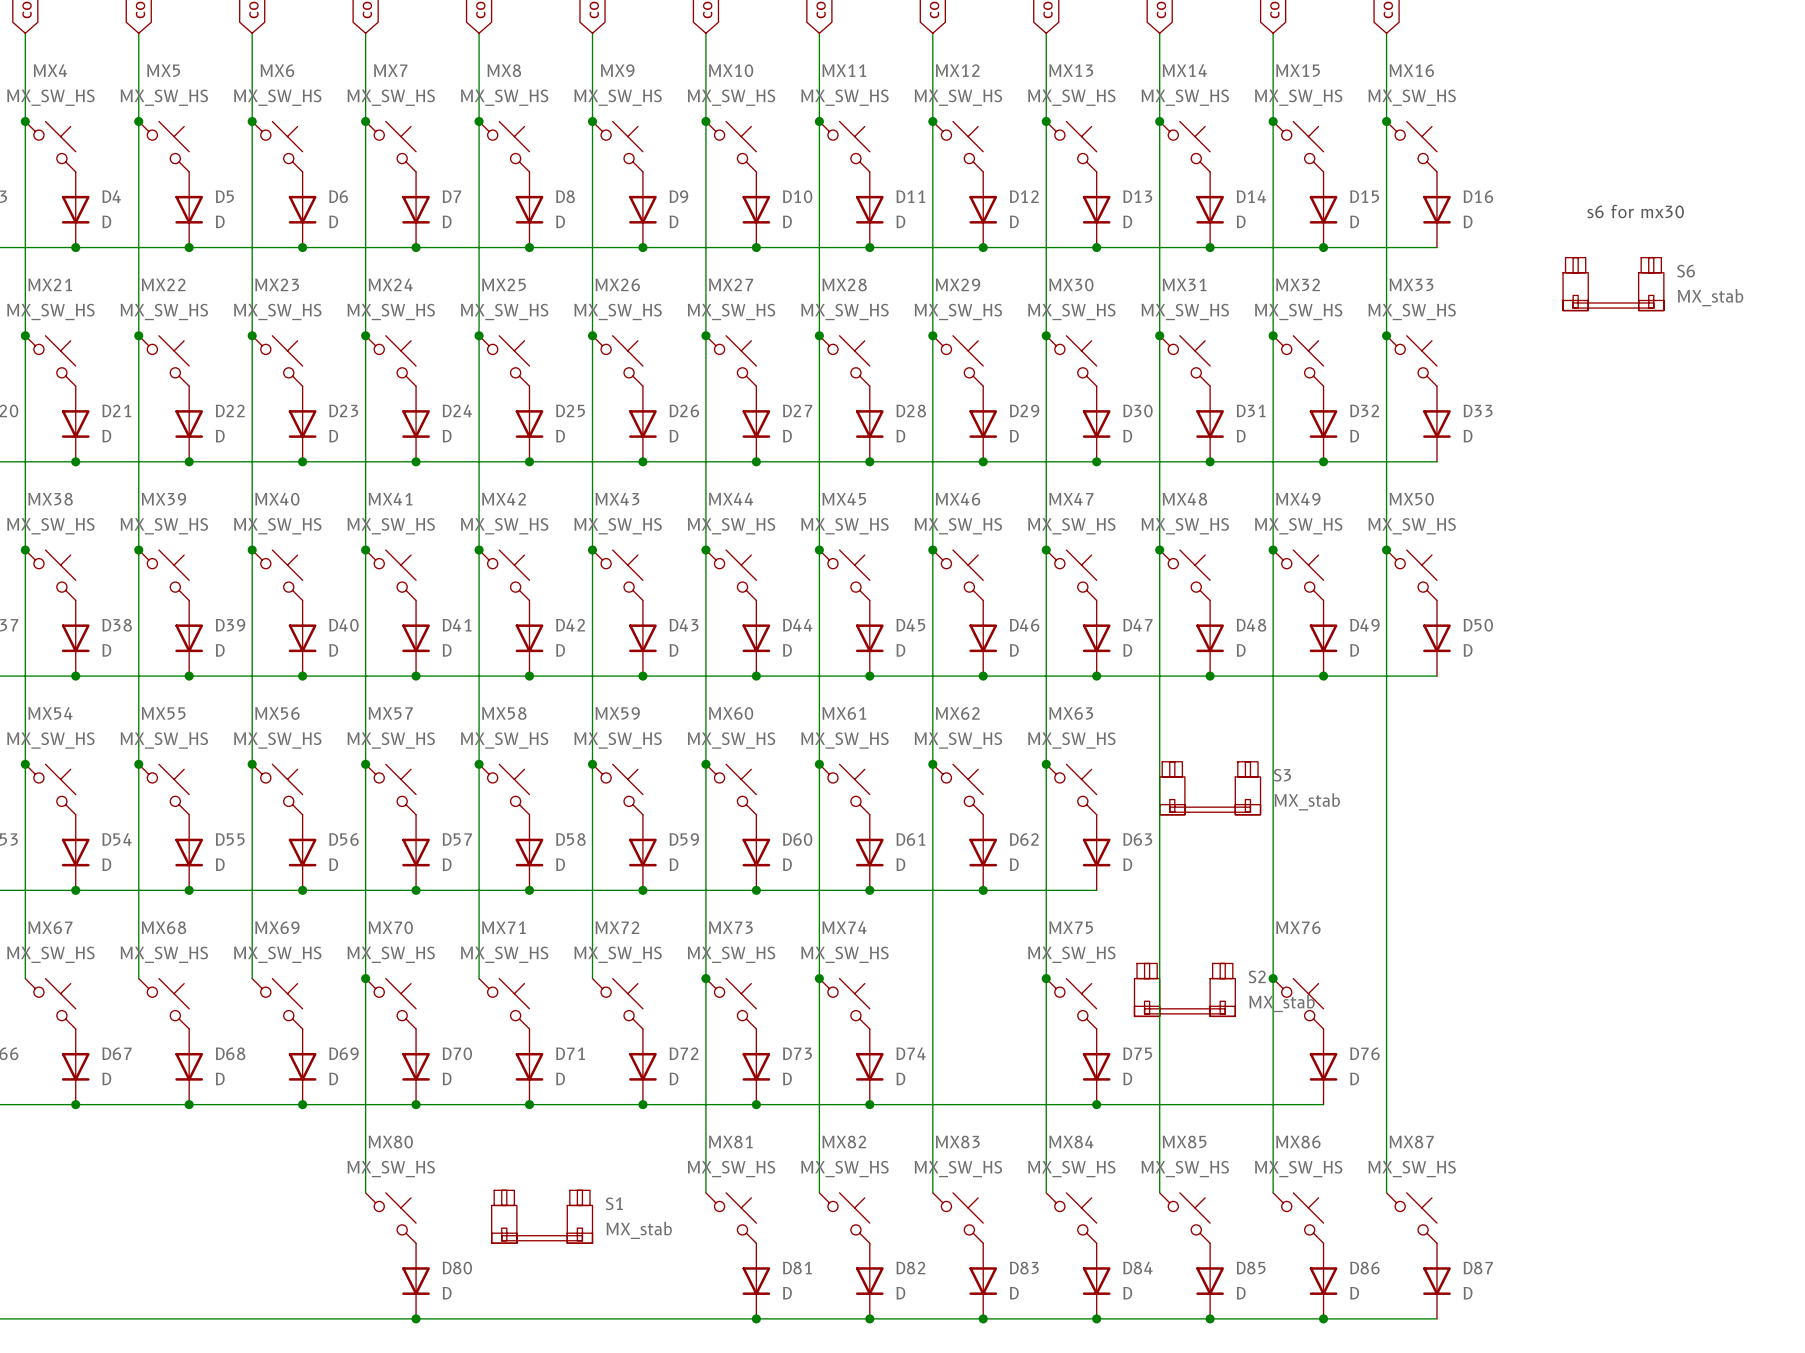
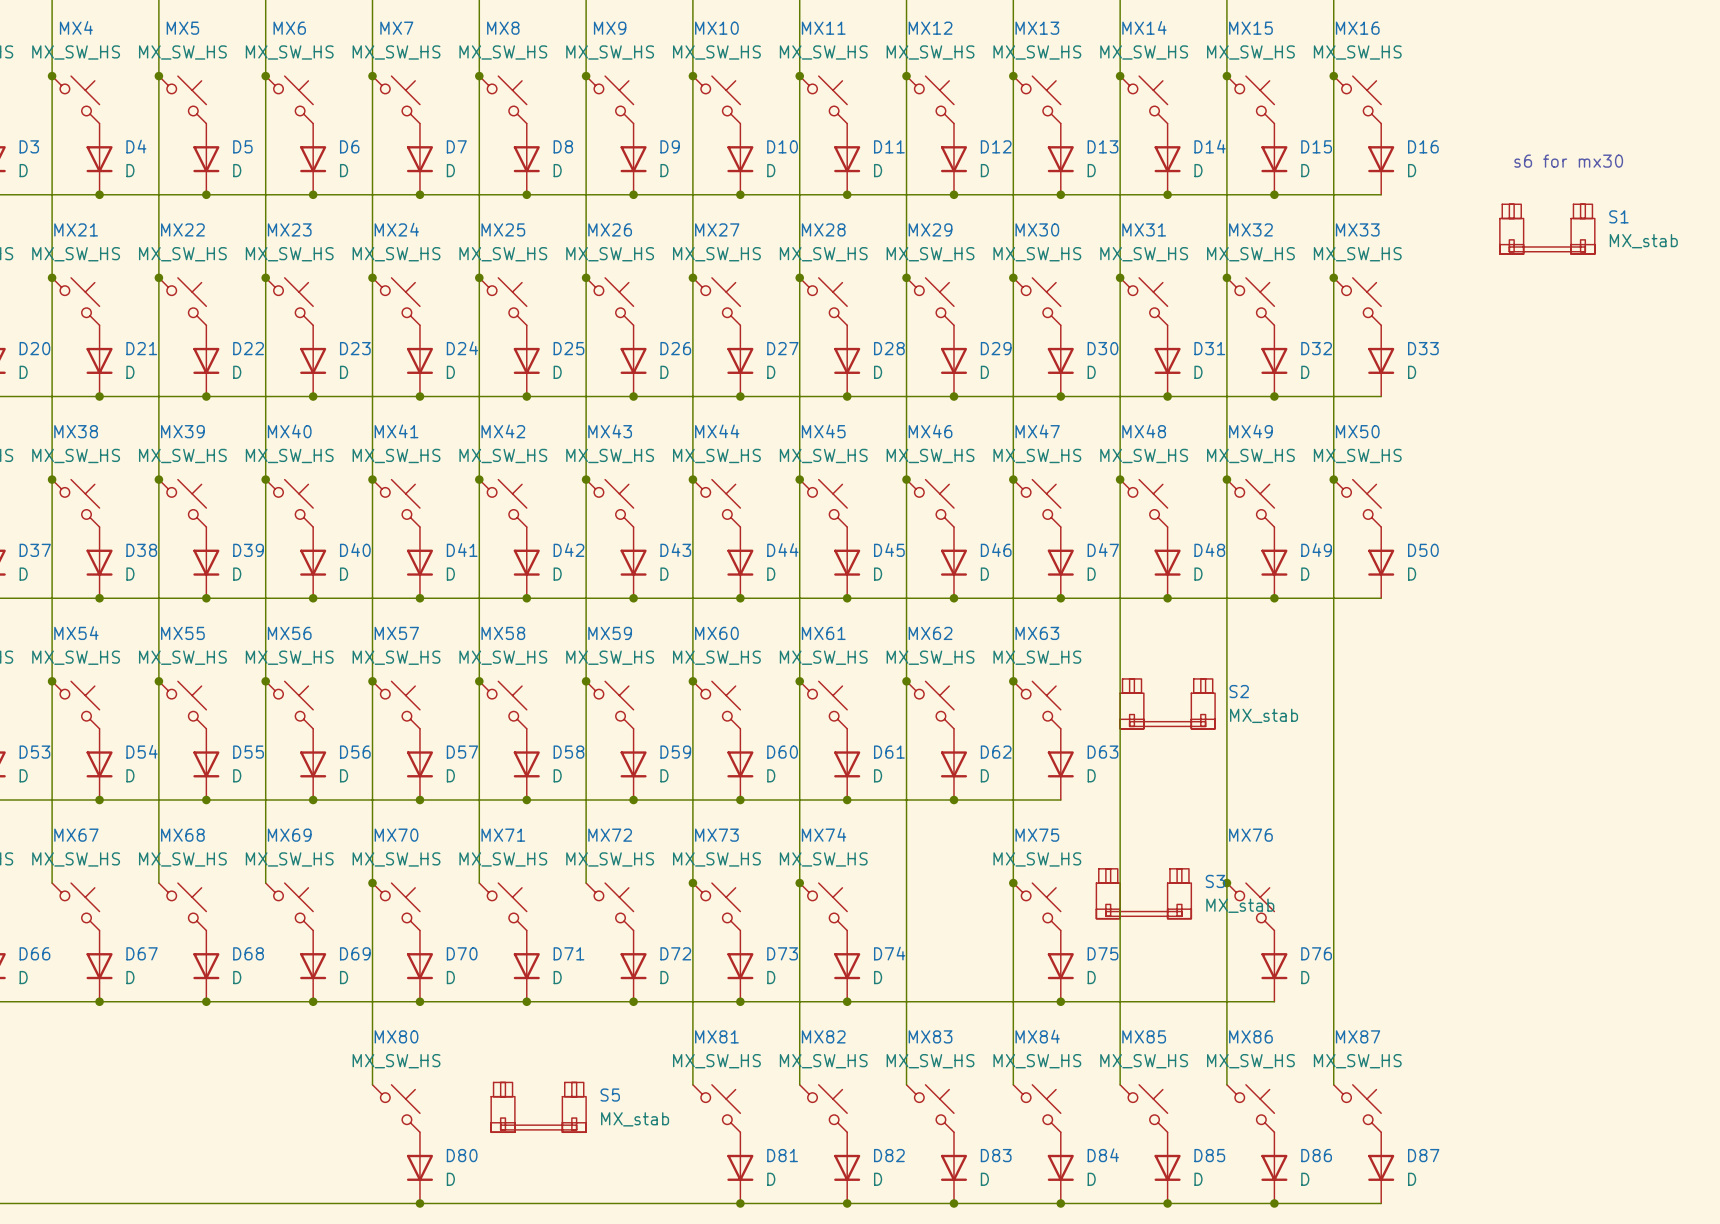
S6 name: S6 (1686, 271) -> S1 (1618, 216)
S3 name: S3 (1282, 775) -> S2 (1239, 691)
S2 name: S2 (1257, 976) -> S3 (1215, 881)
S1 name: S1 (614, 1203) -> S5 (610, 1095)

